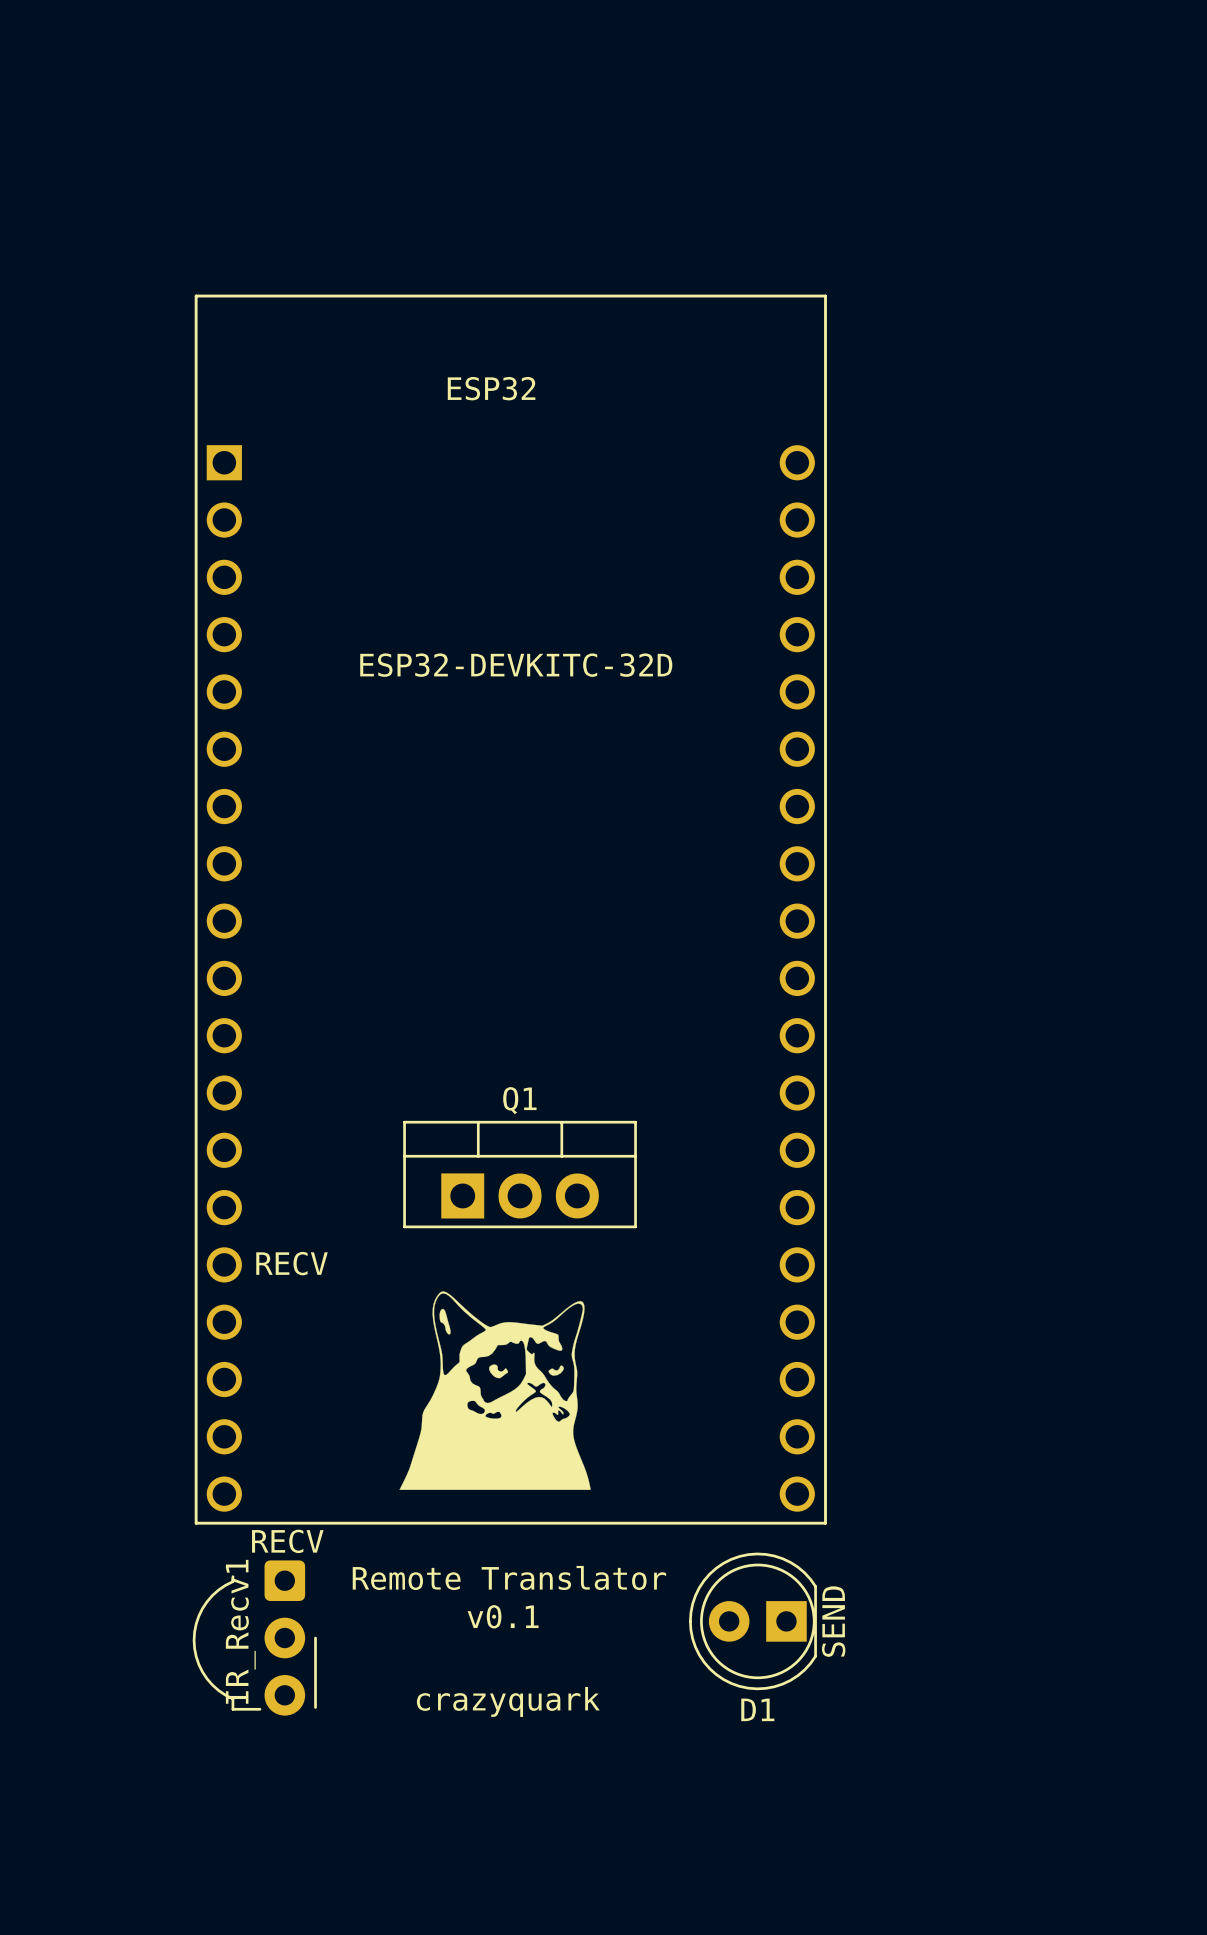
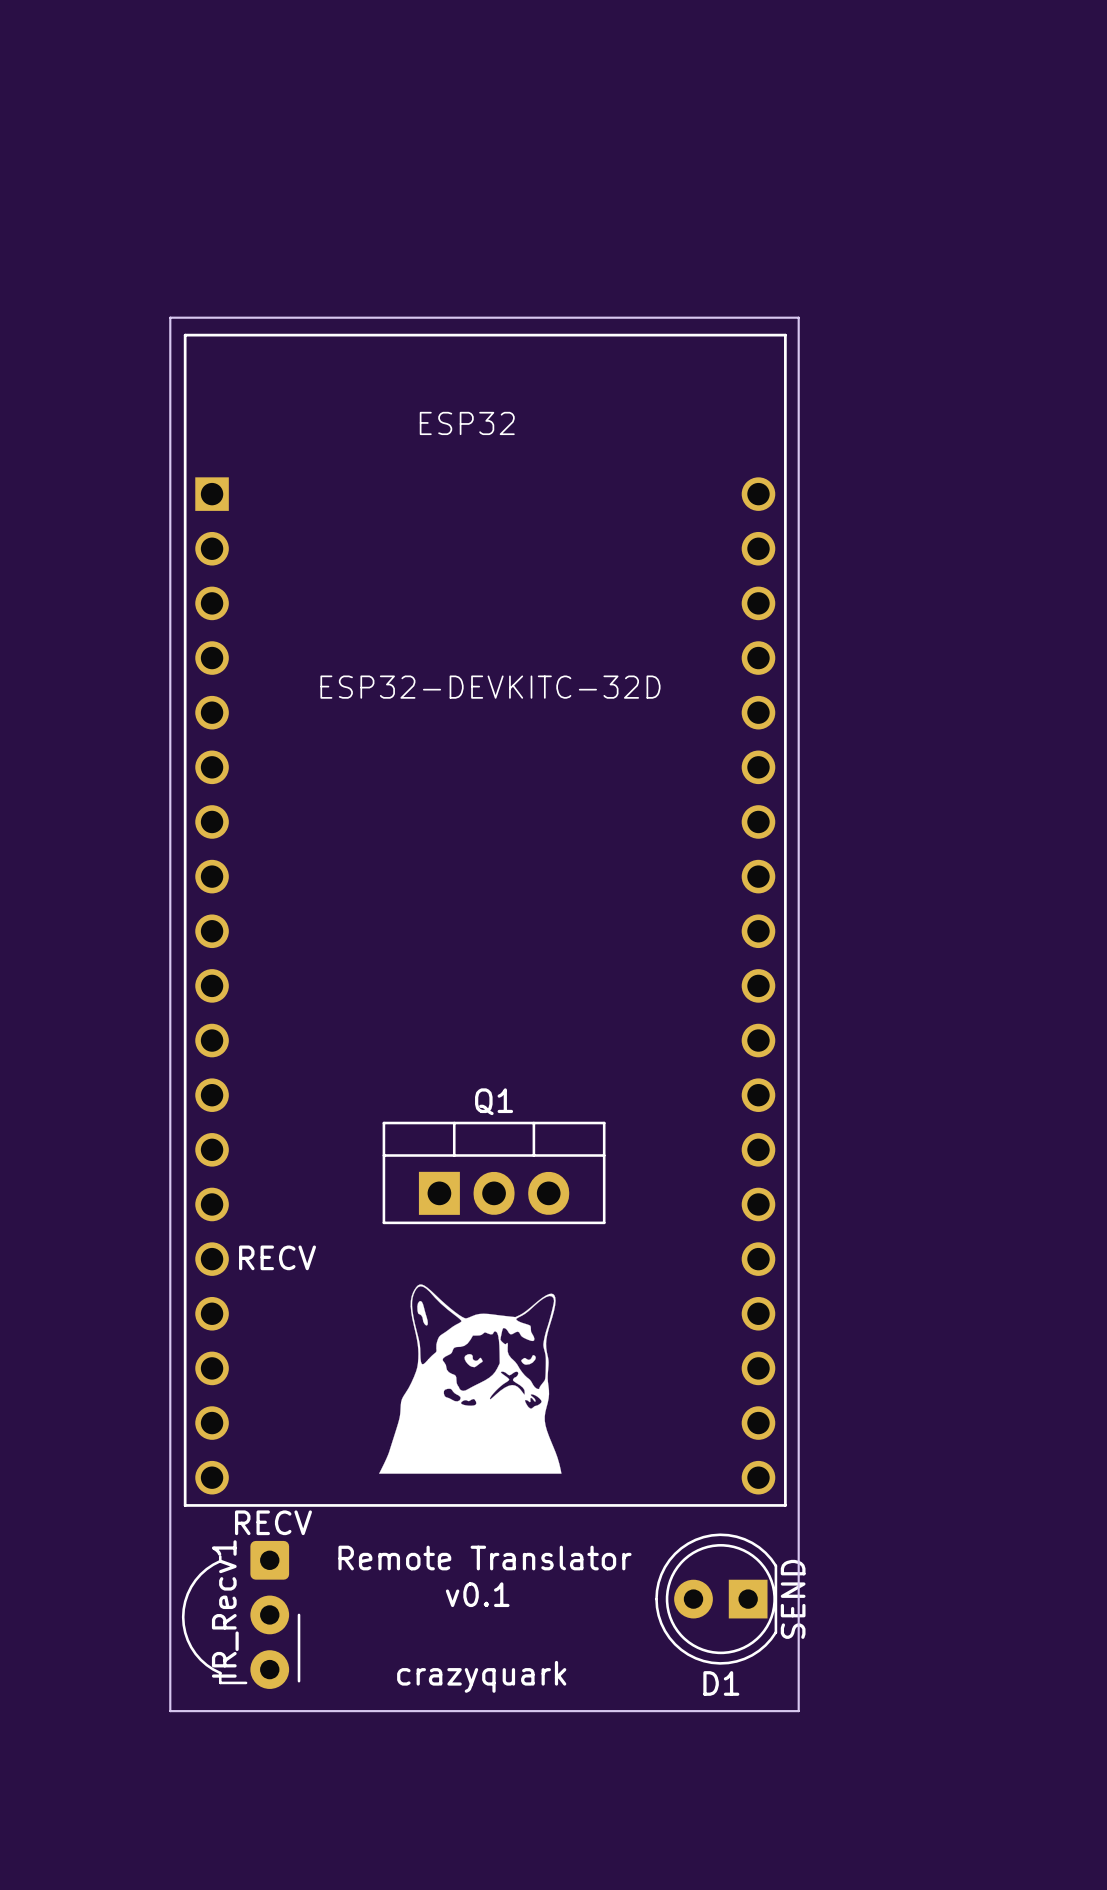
board edge: none -> (170, 317) (170, 1711) (798, 1711) (798, 317) (170, 317)

